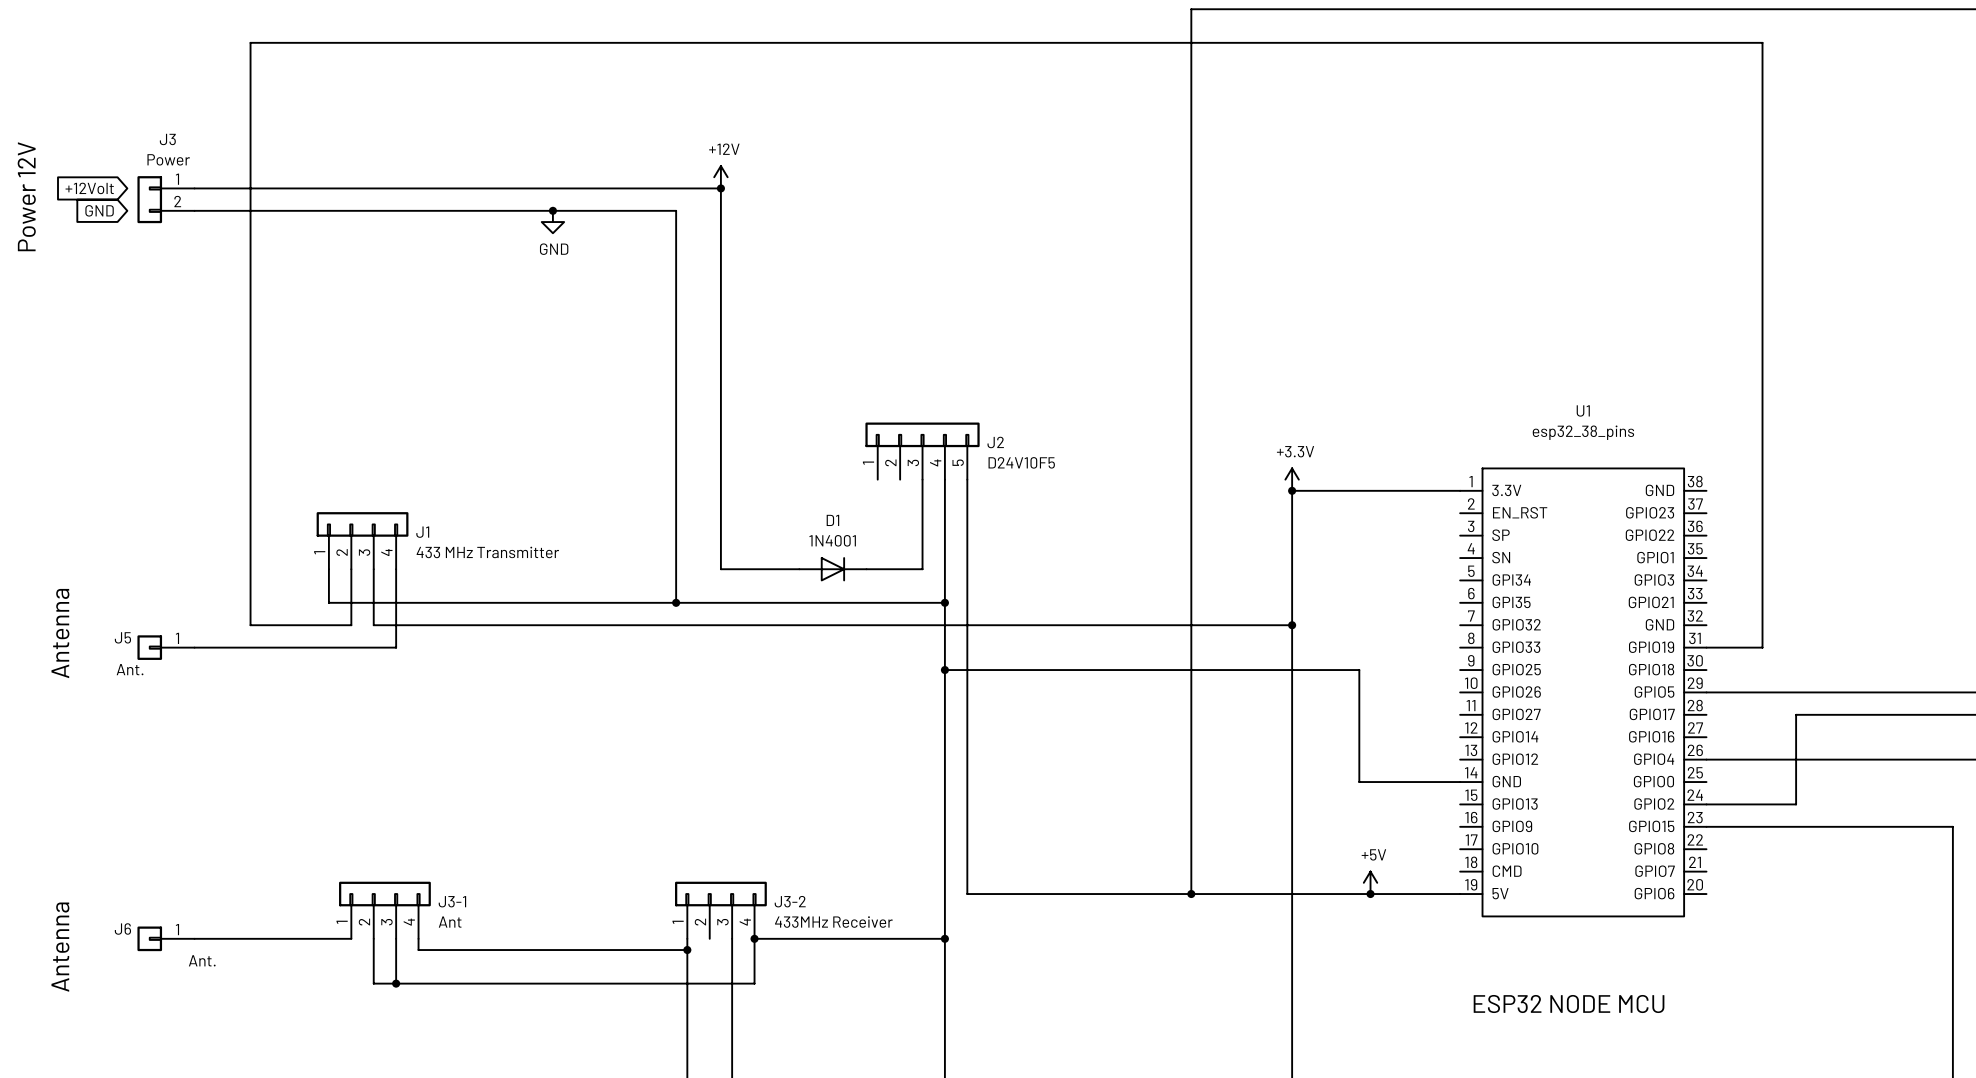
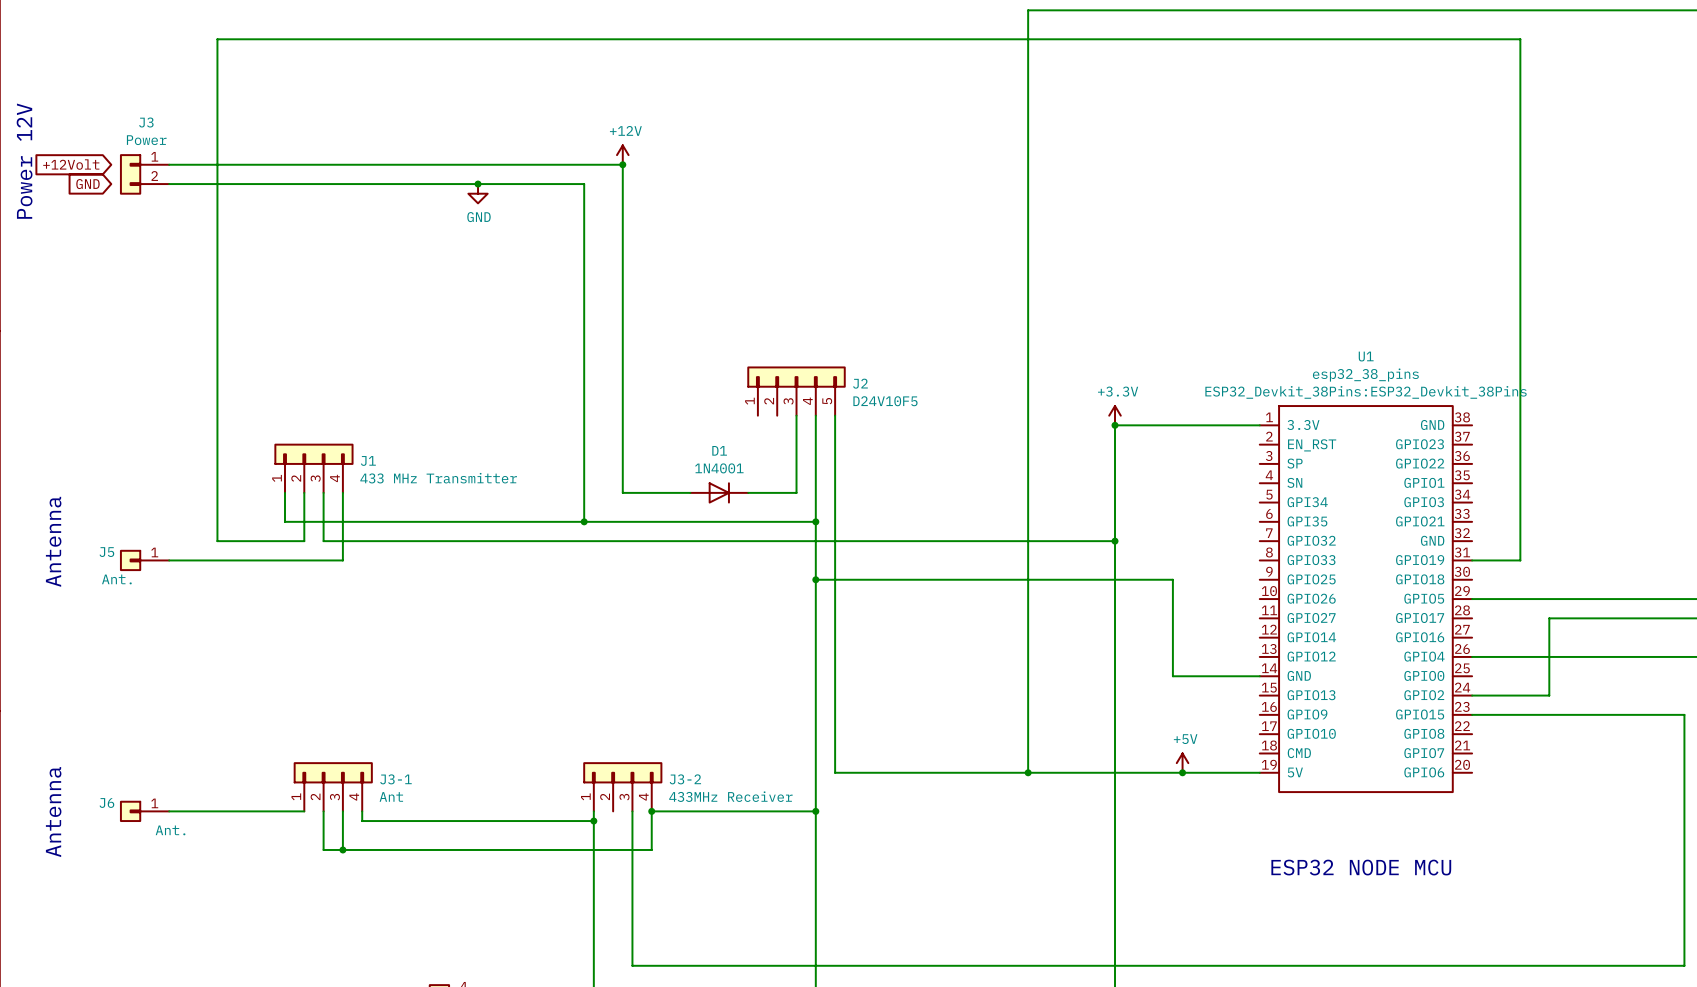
U1 text: none -> ESP32_Devkit_38Pins:ESP32_Devkit_38Pins (1366, 392)

